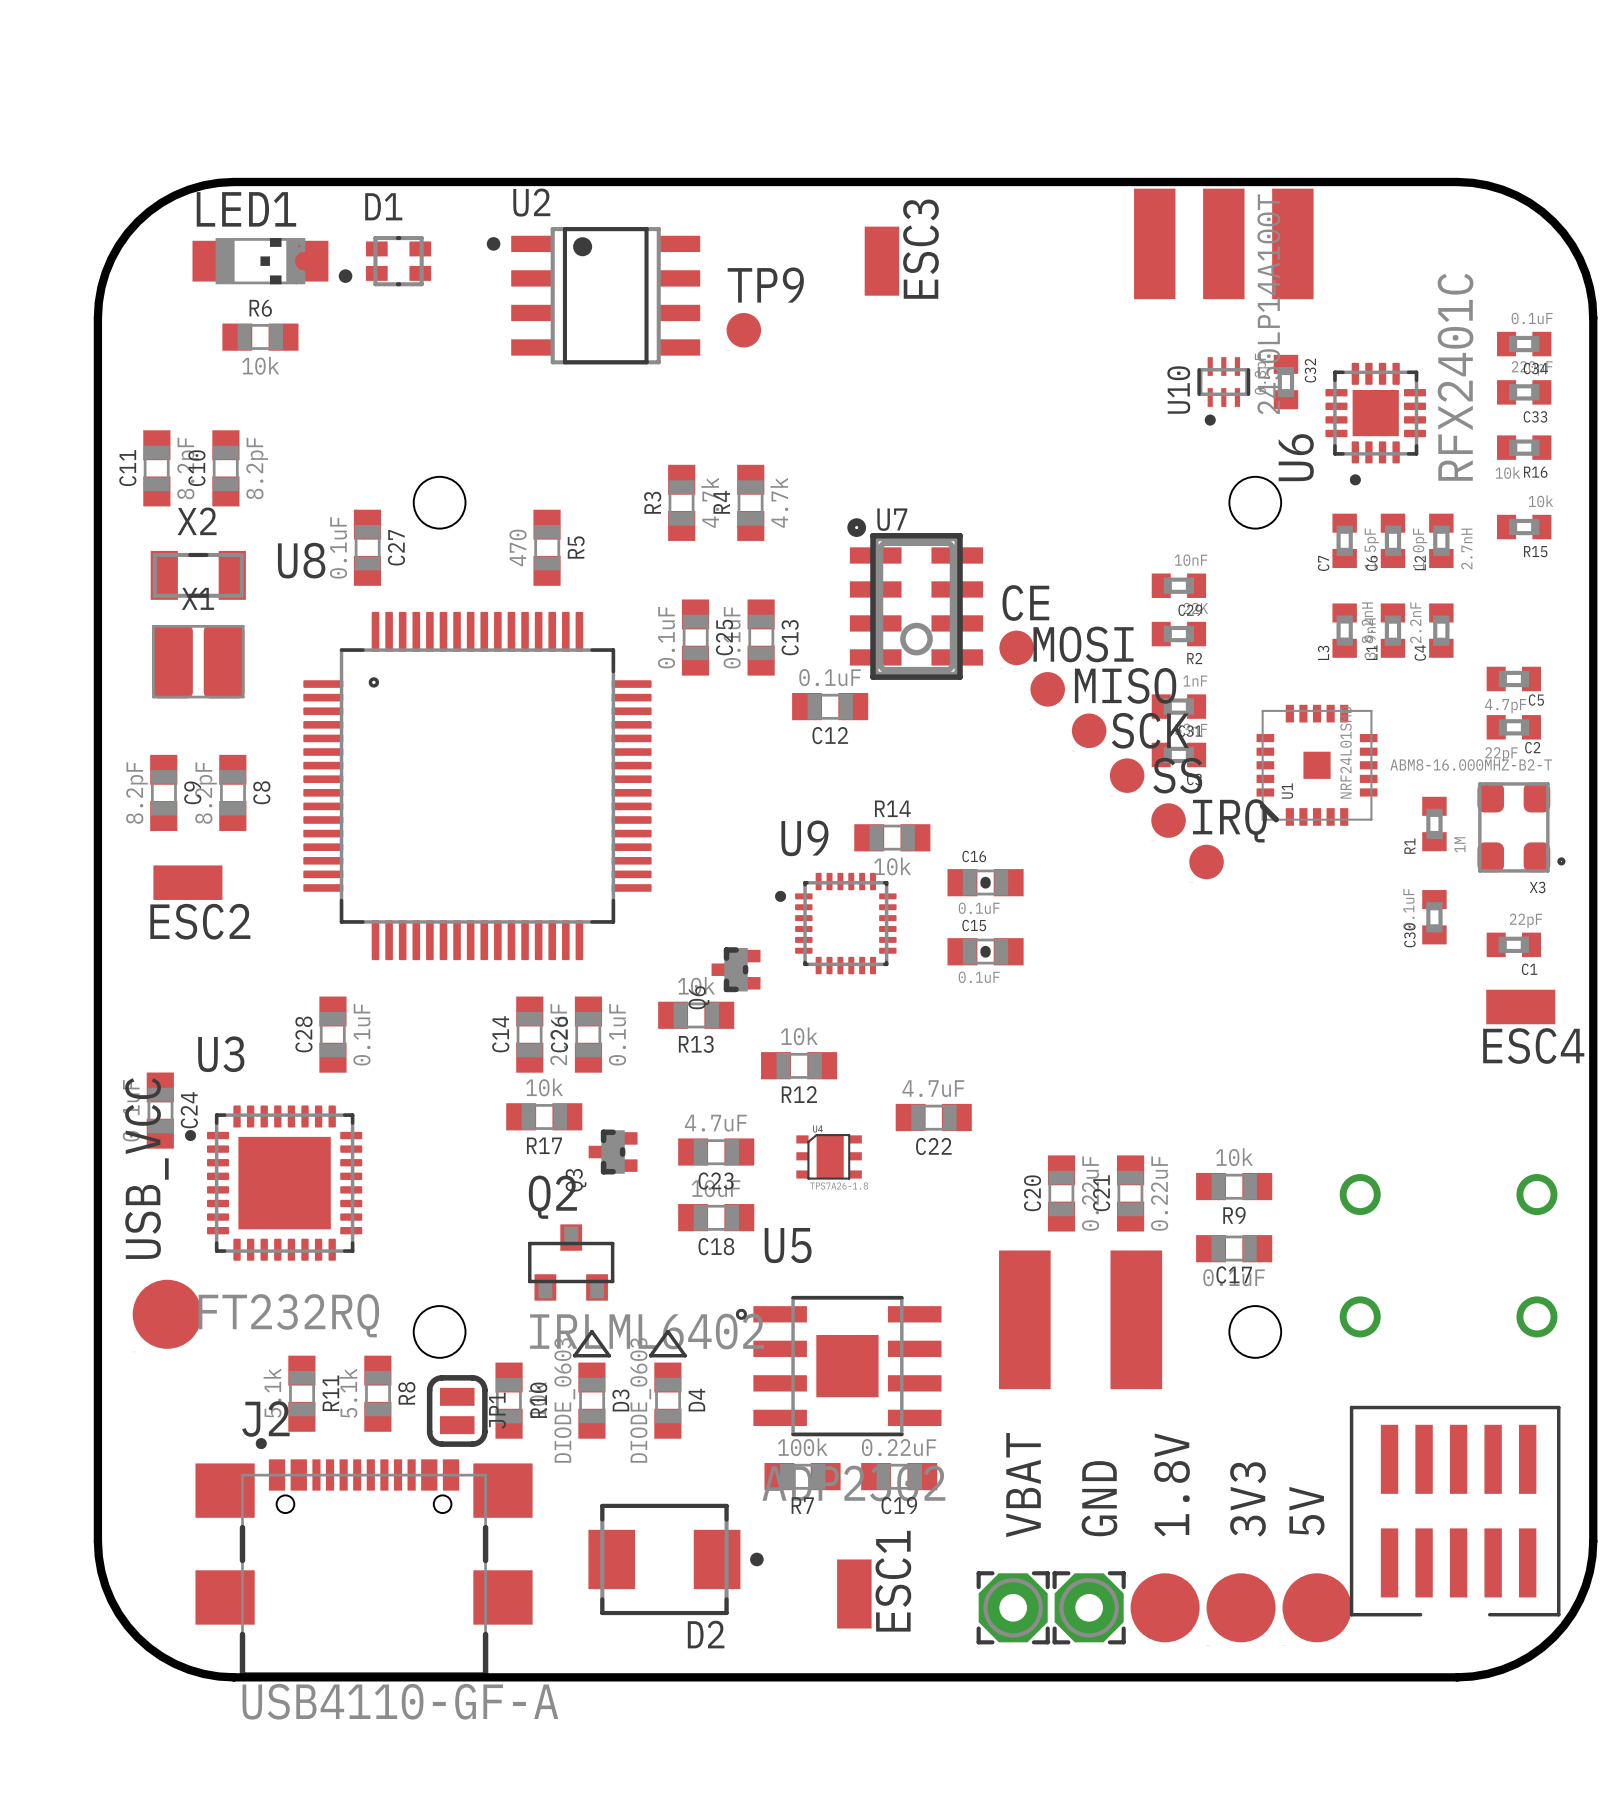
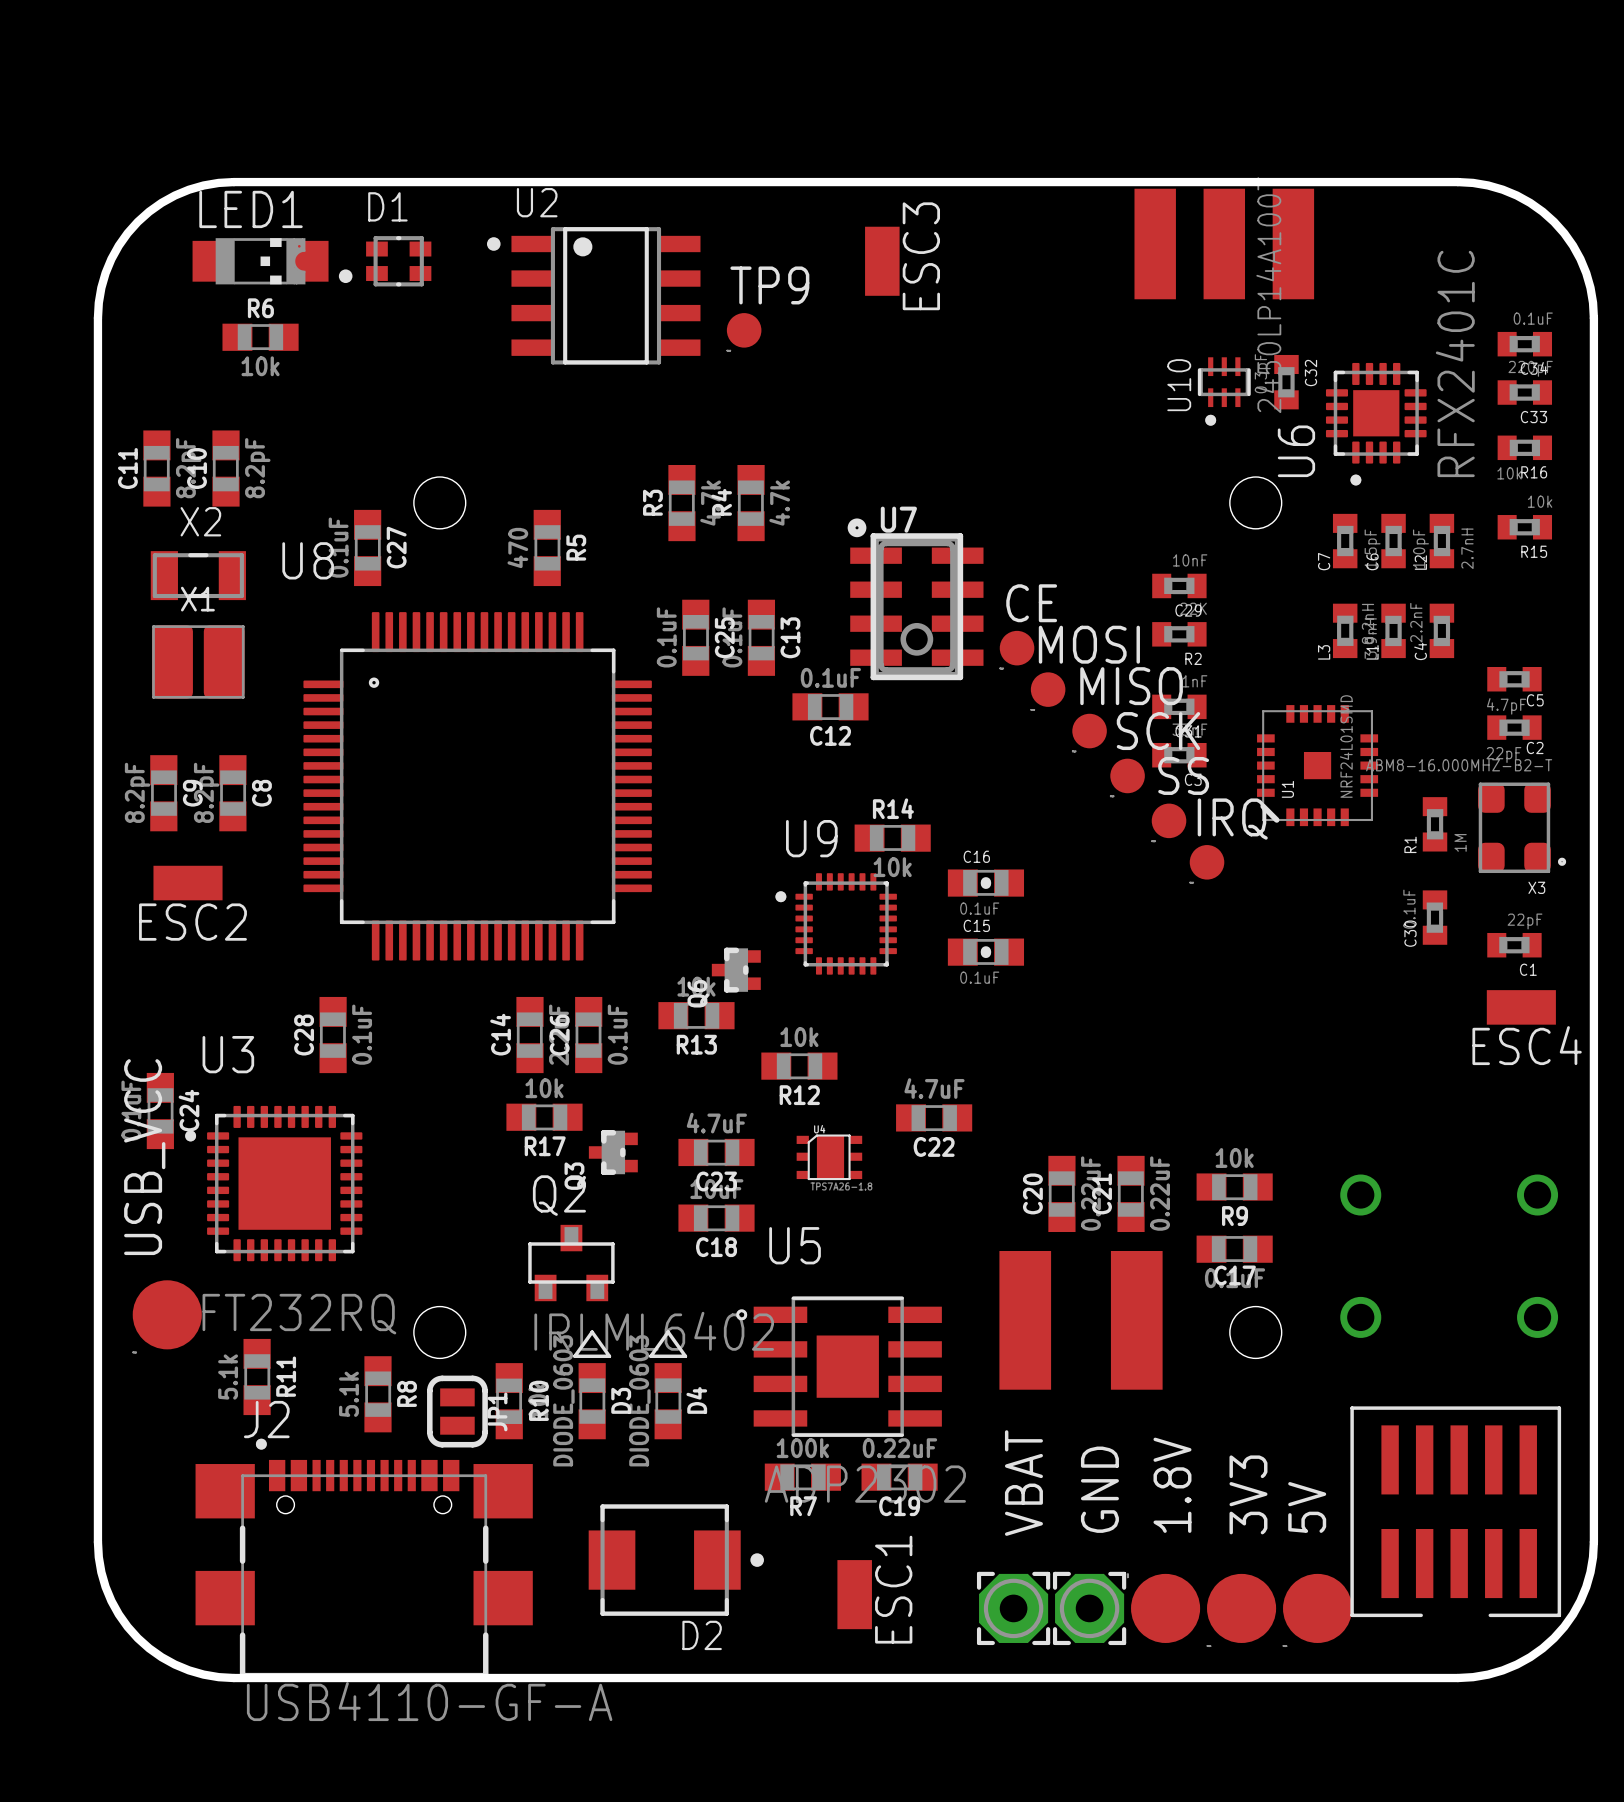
R11 position: (301, 1393) -> (257, 1377)

